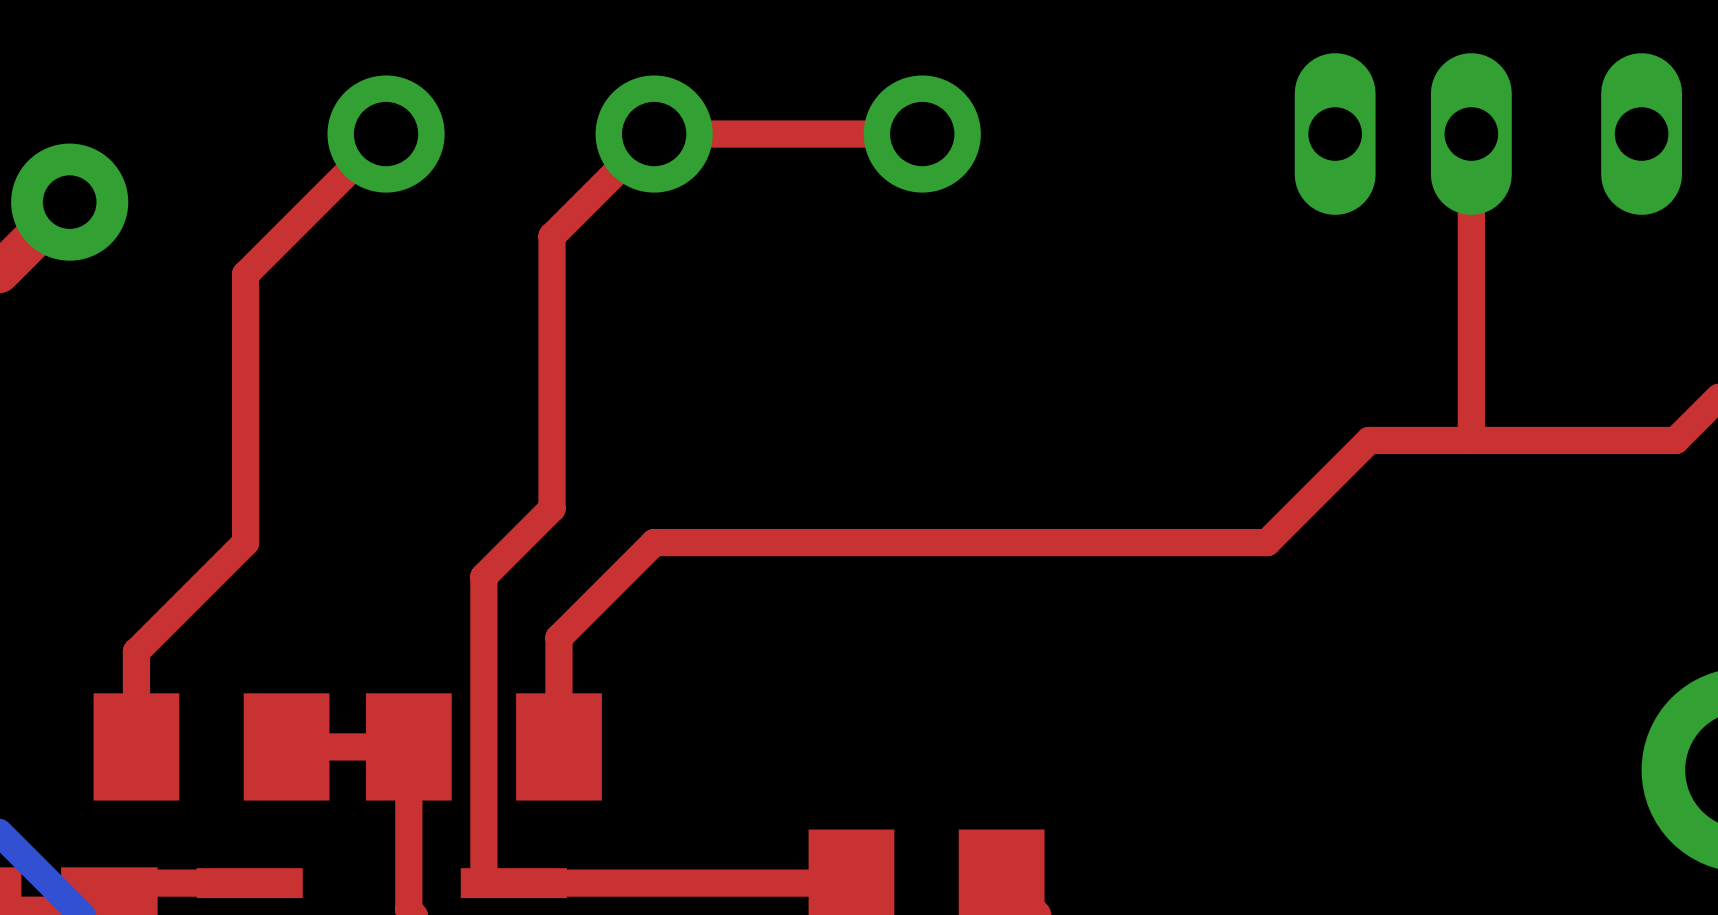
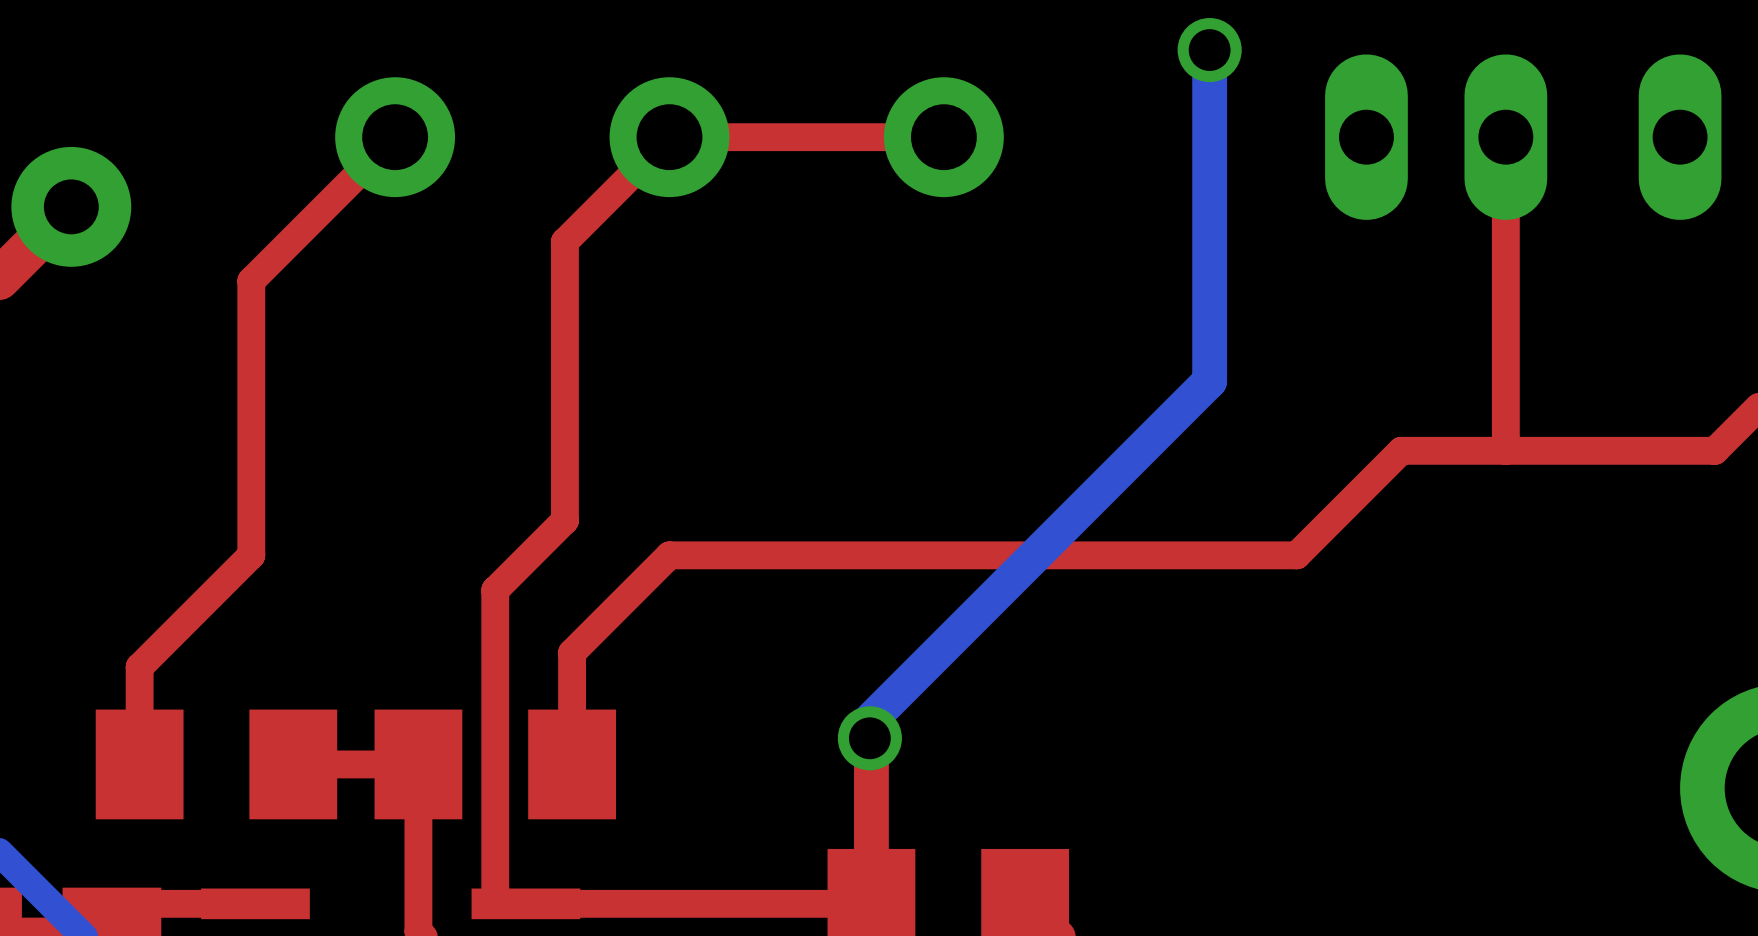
bottom track: none -> (1209, 50) (1209, 381) (861, 729) (869, 738)
via: none -> (1209, 50)
top track: none -> (869, 738) (871, 903)
via: none -> (869, 738)

